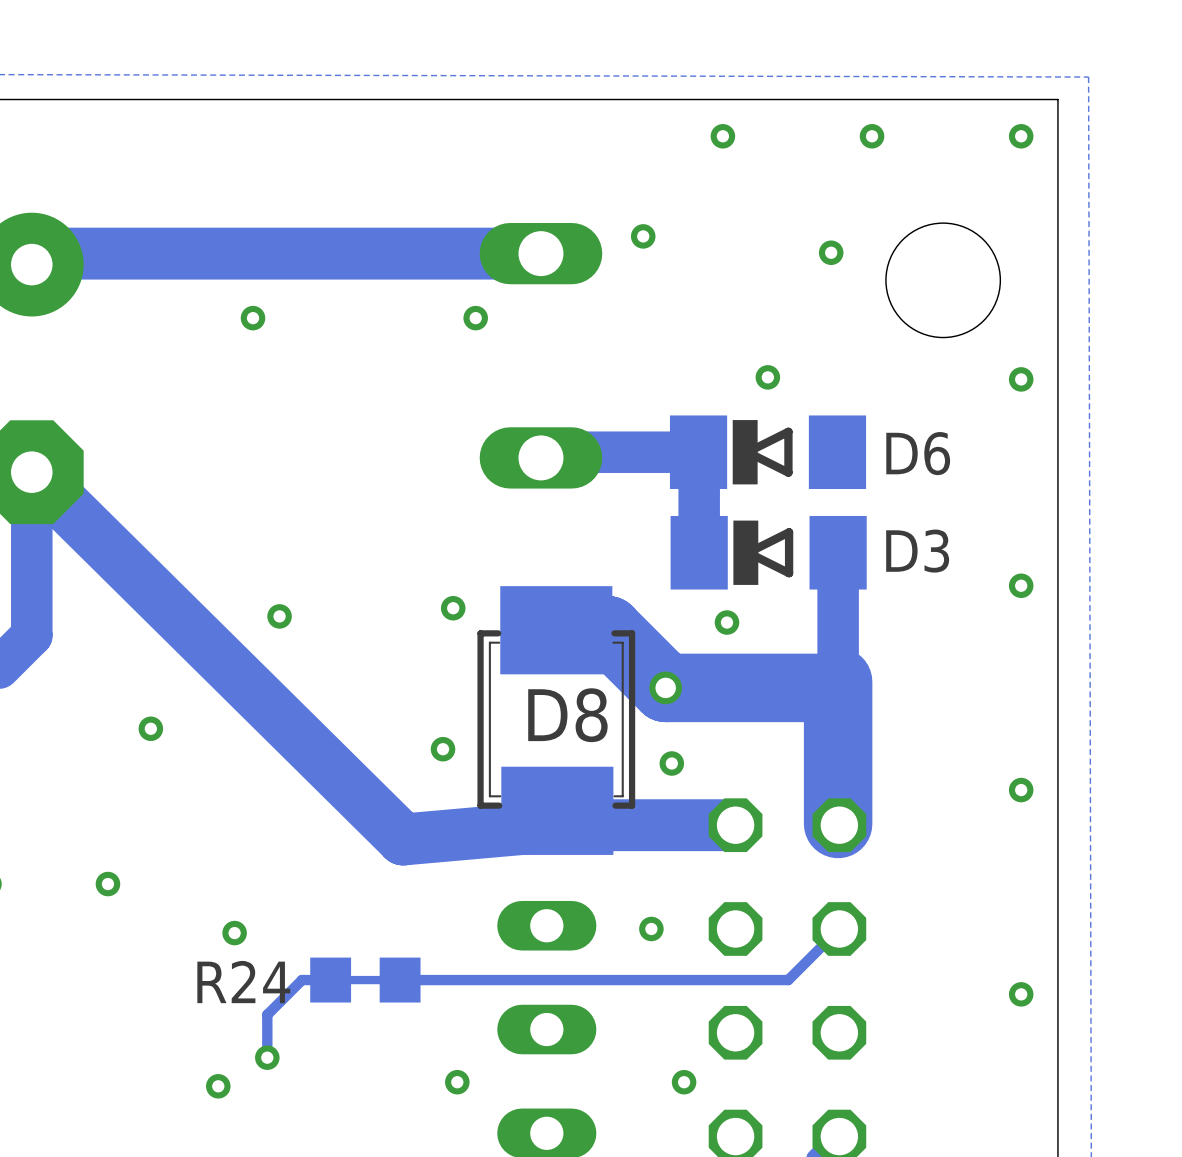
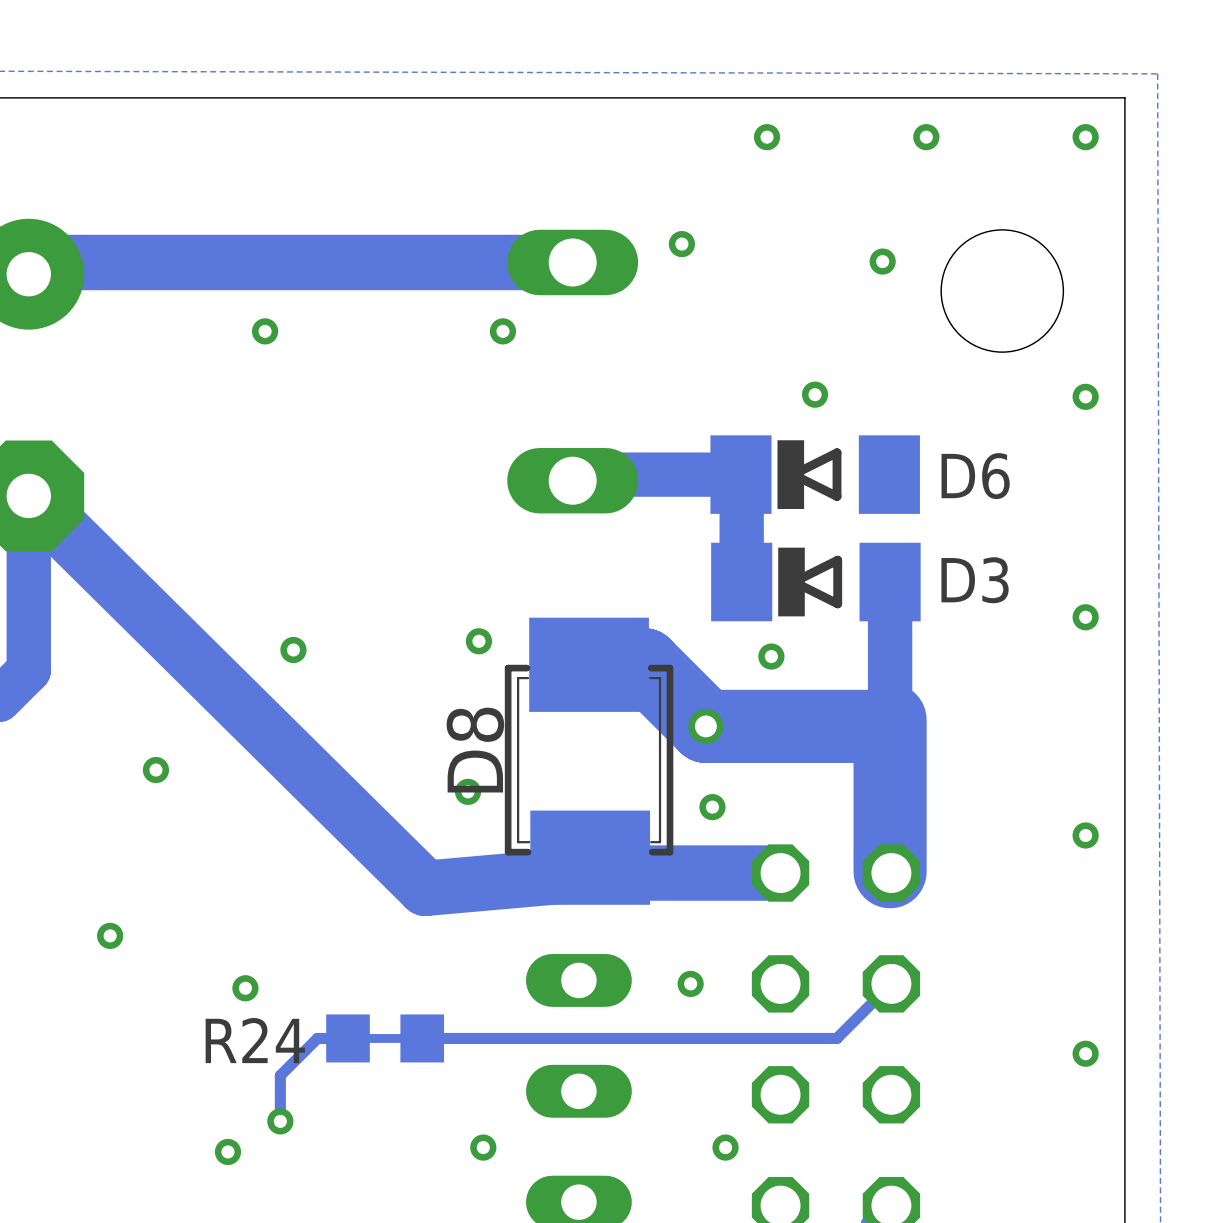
D8 name rotation: 0° (567, 715) -> 90° counterclockwise (475, 750)

